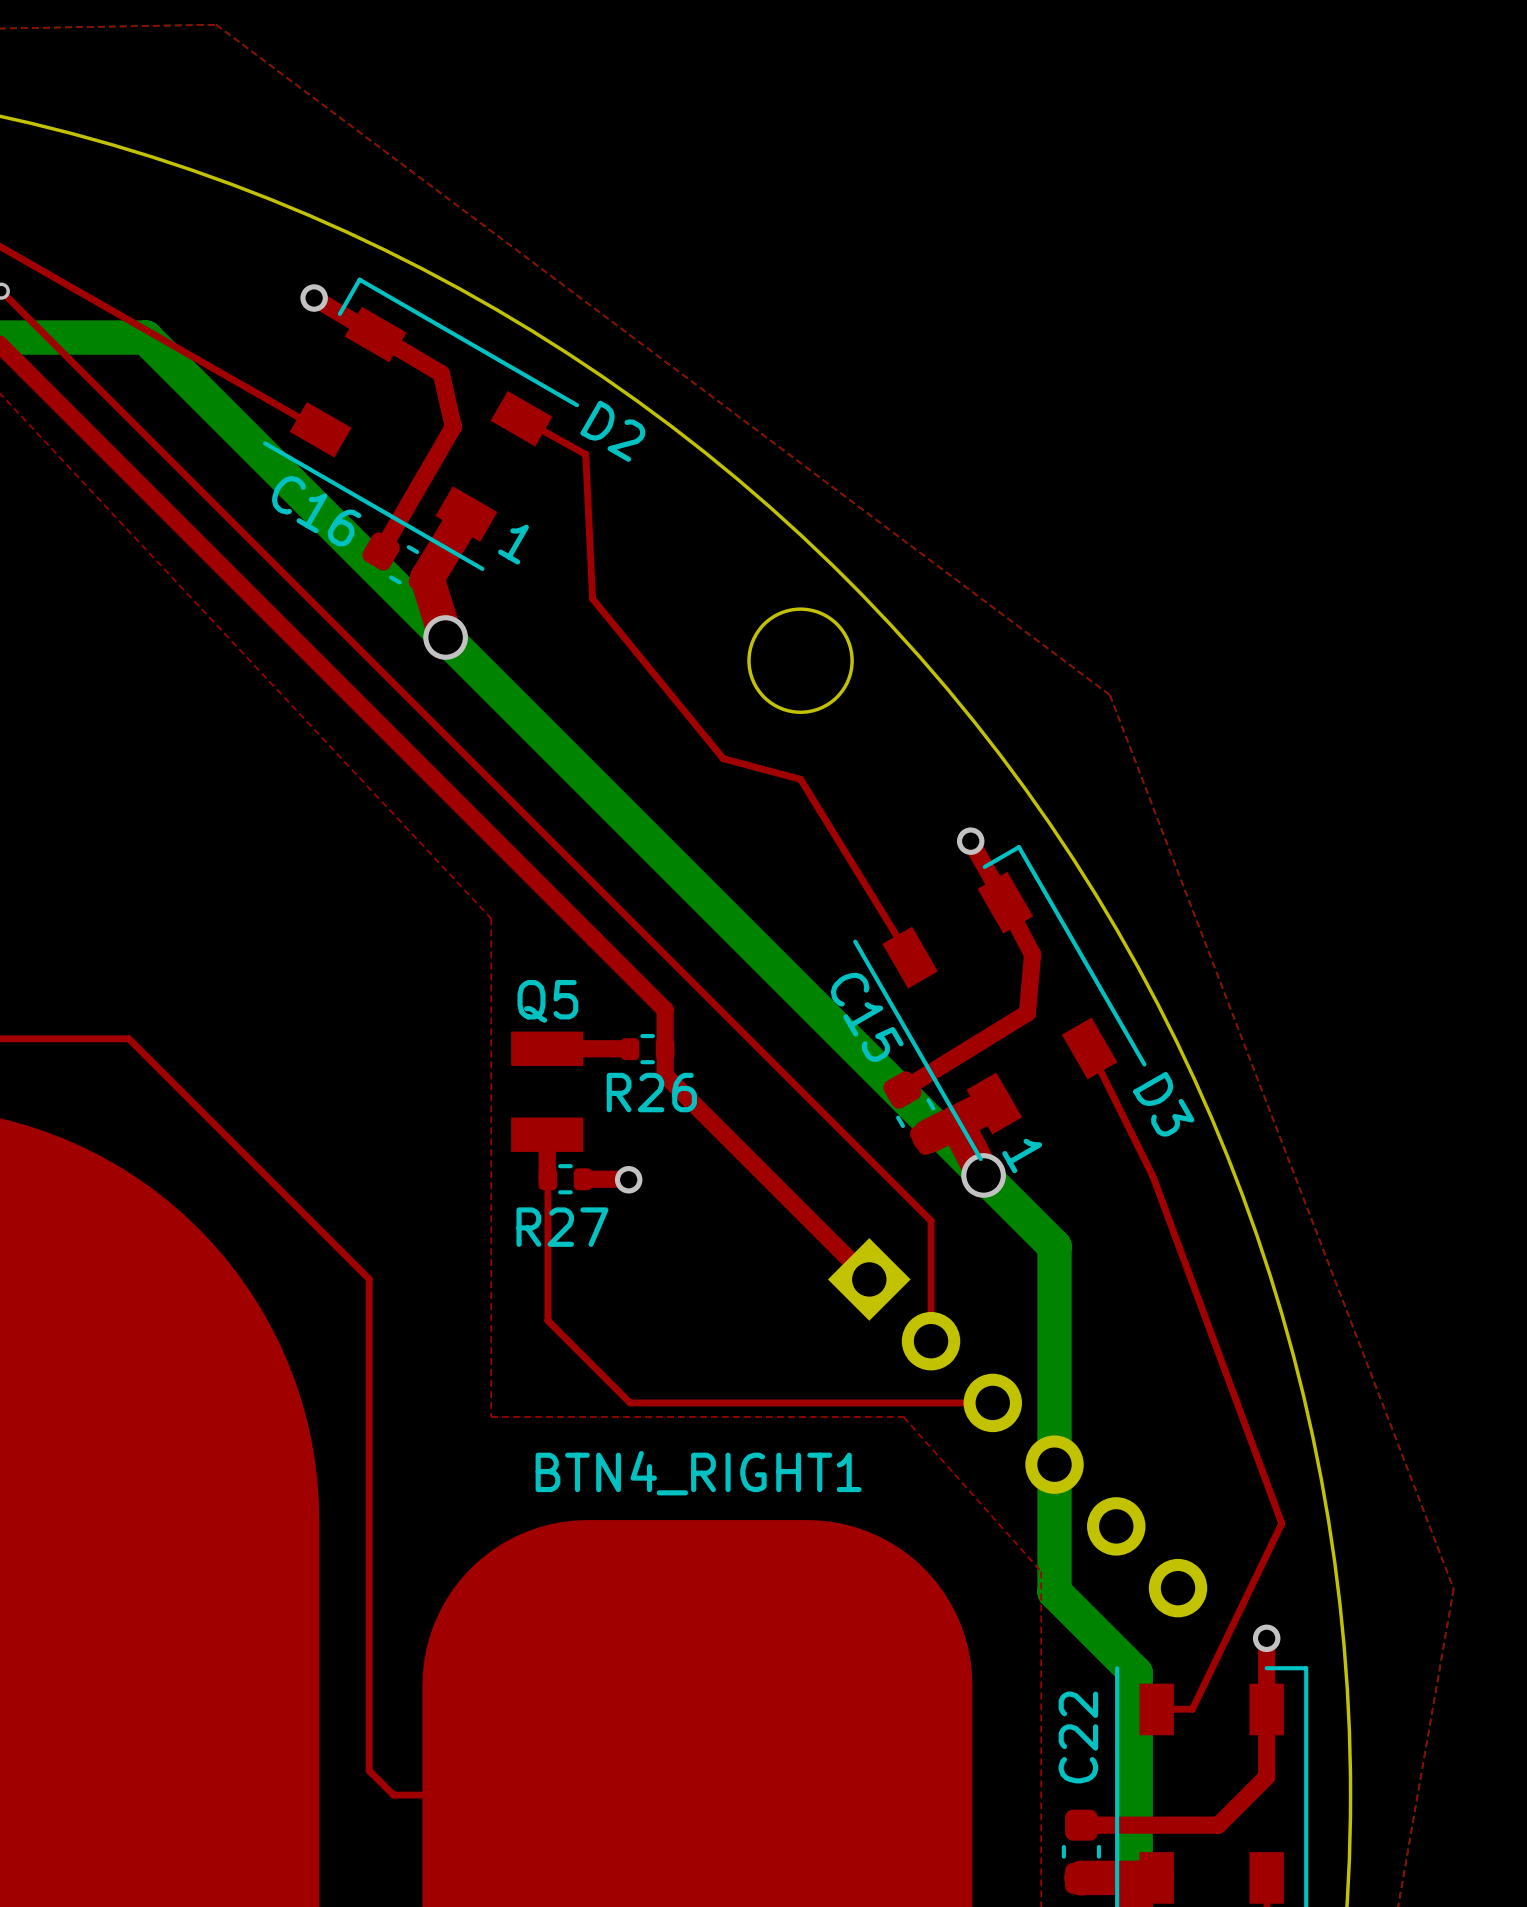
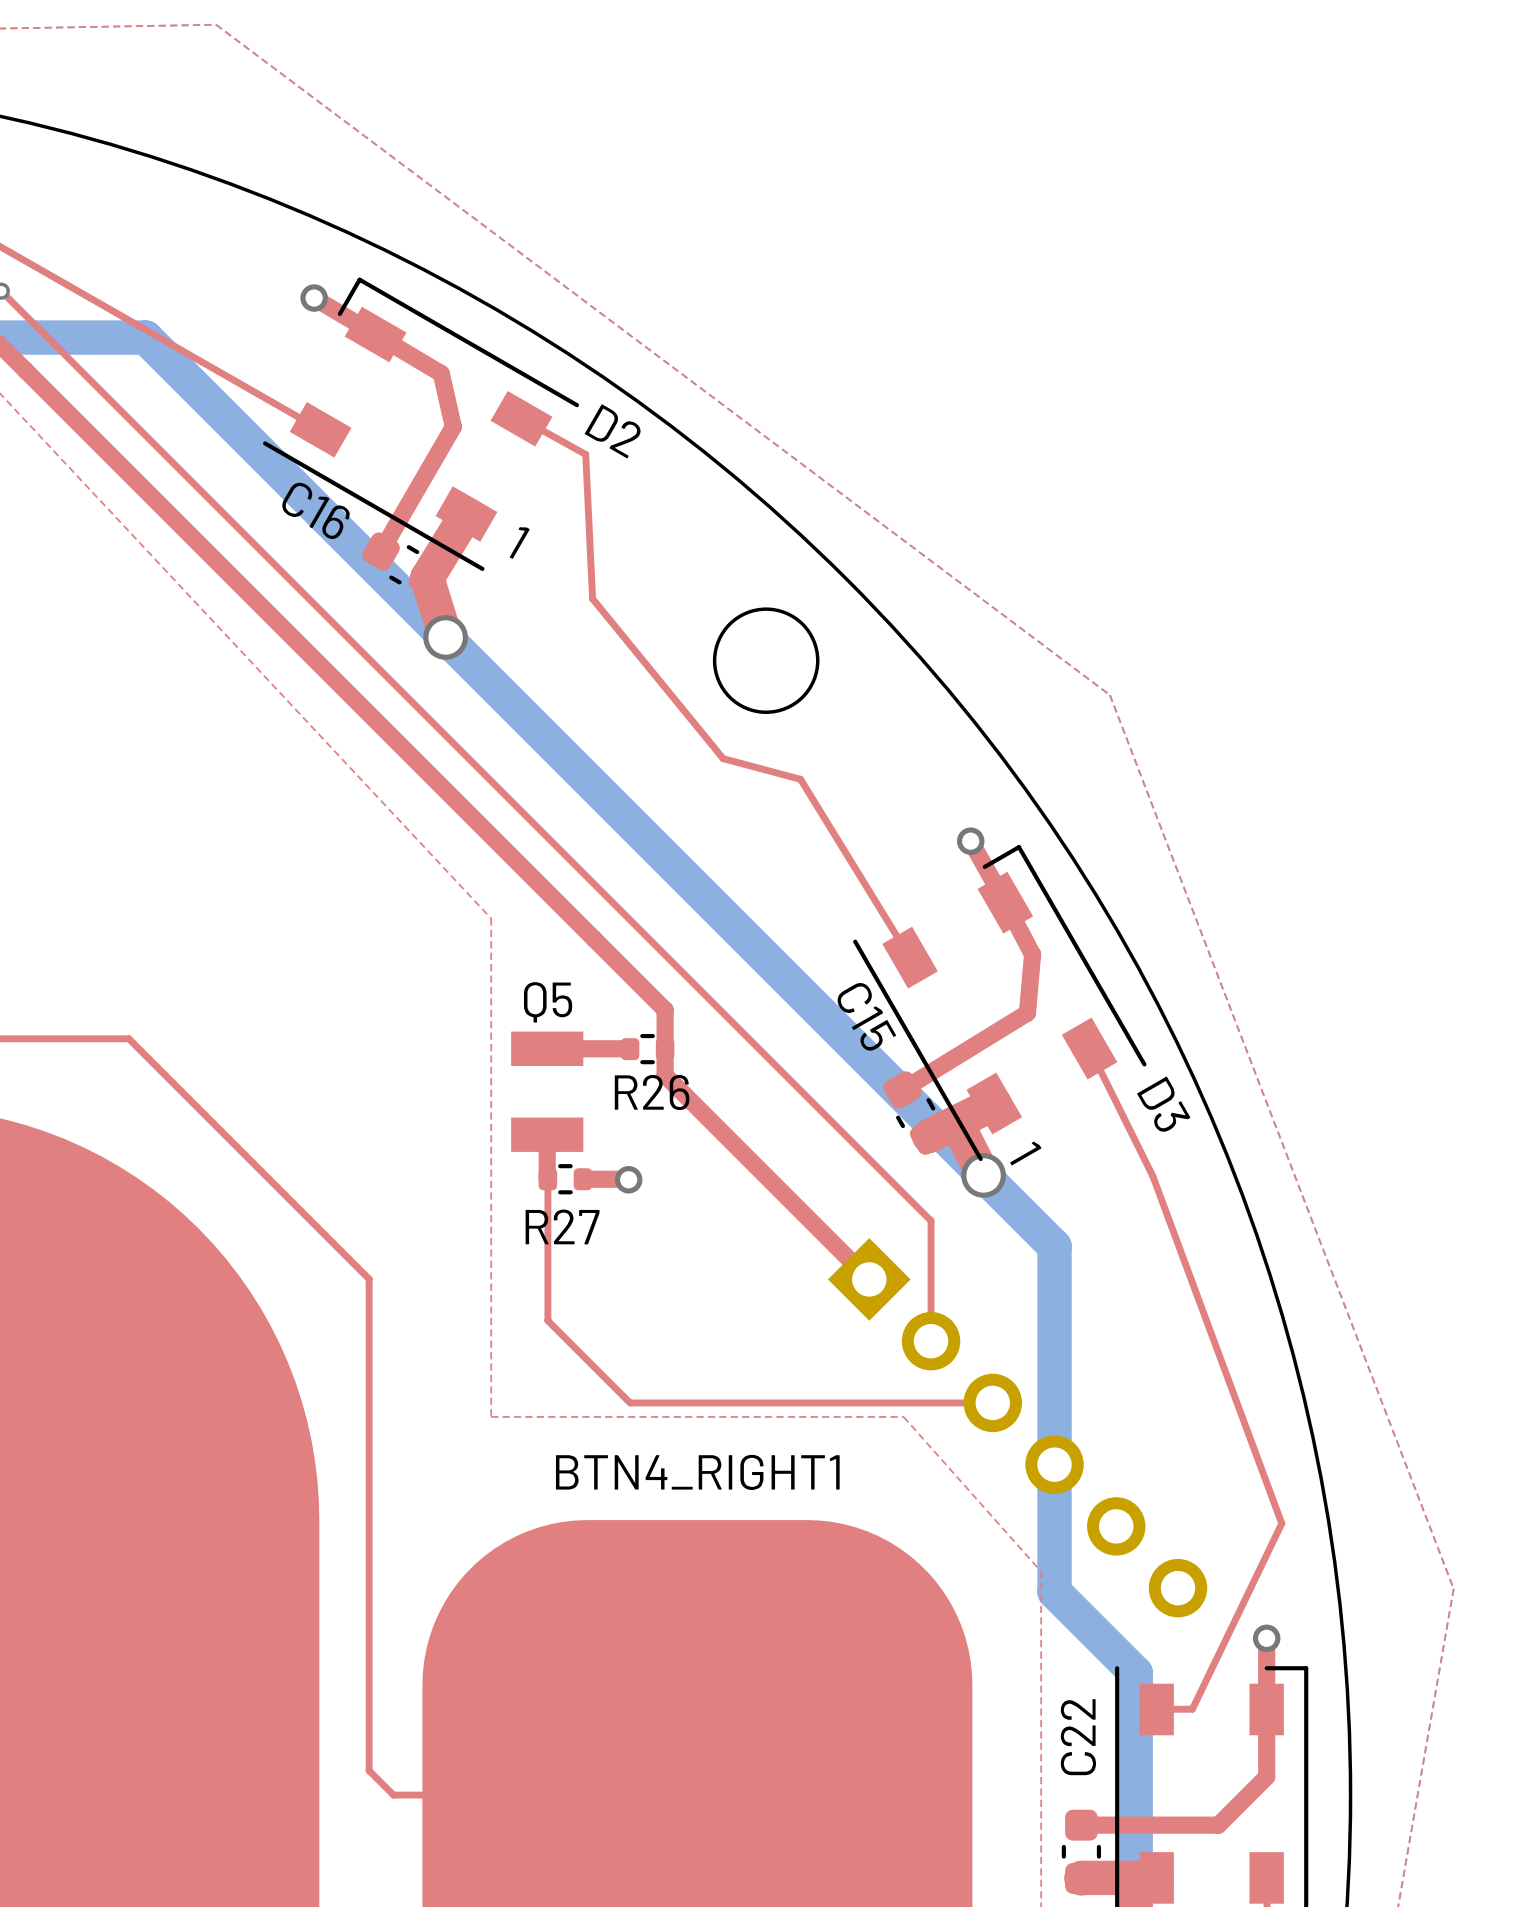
round board edge position: (800, 660) -> (766, 660)

